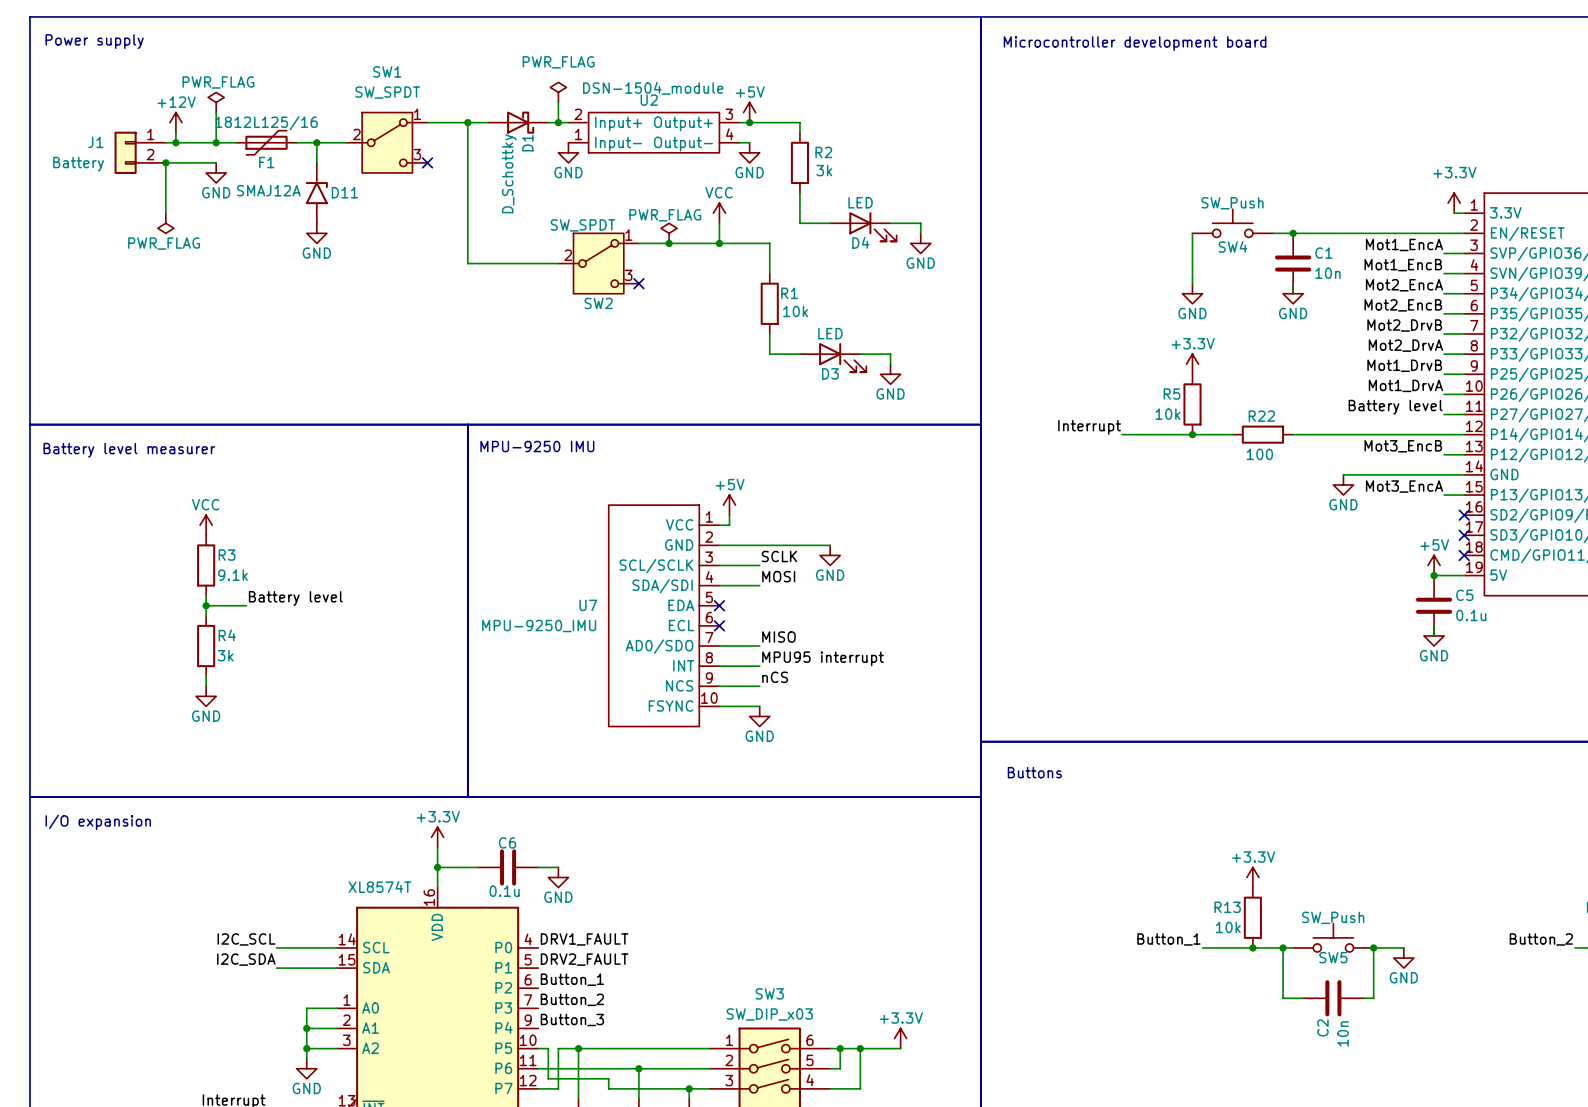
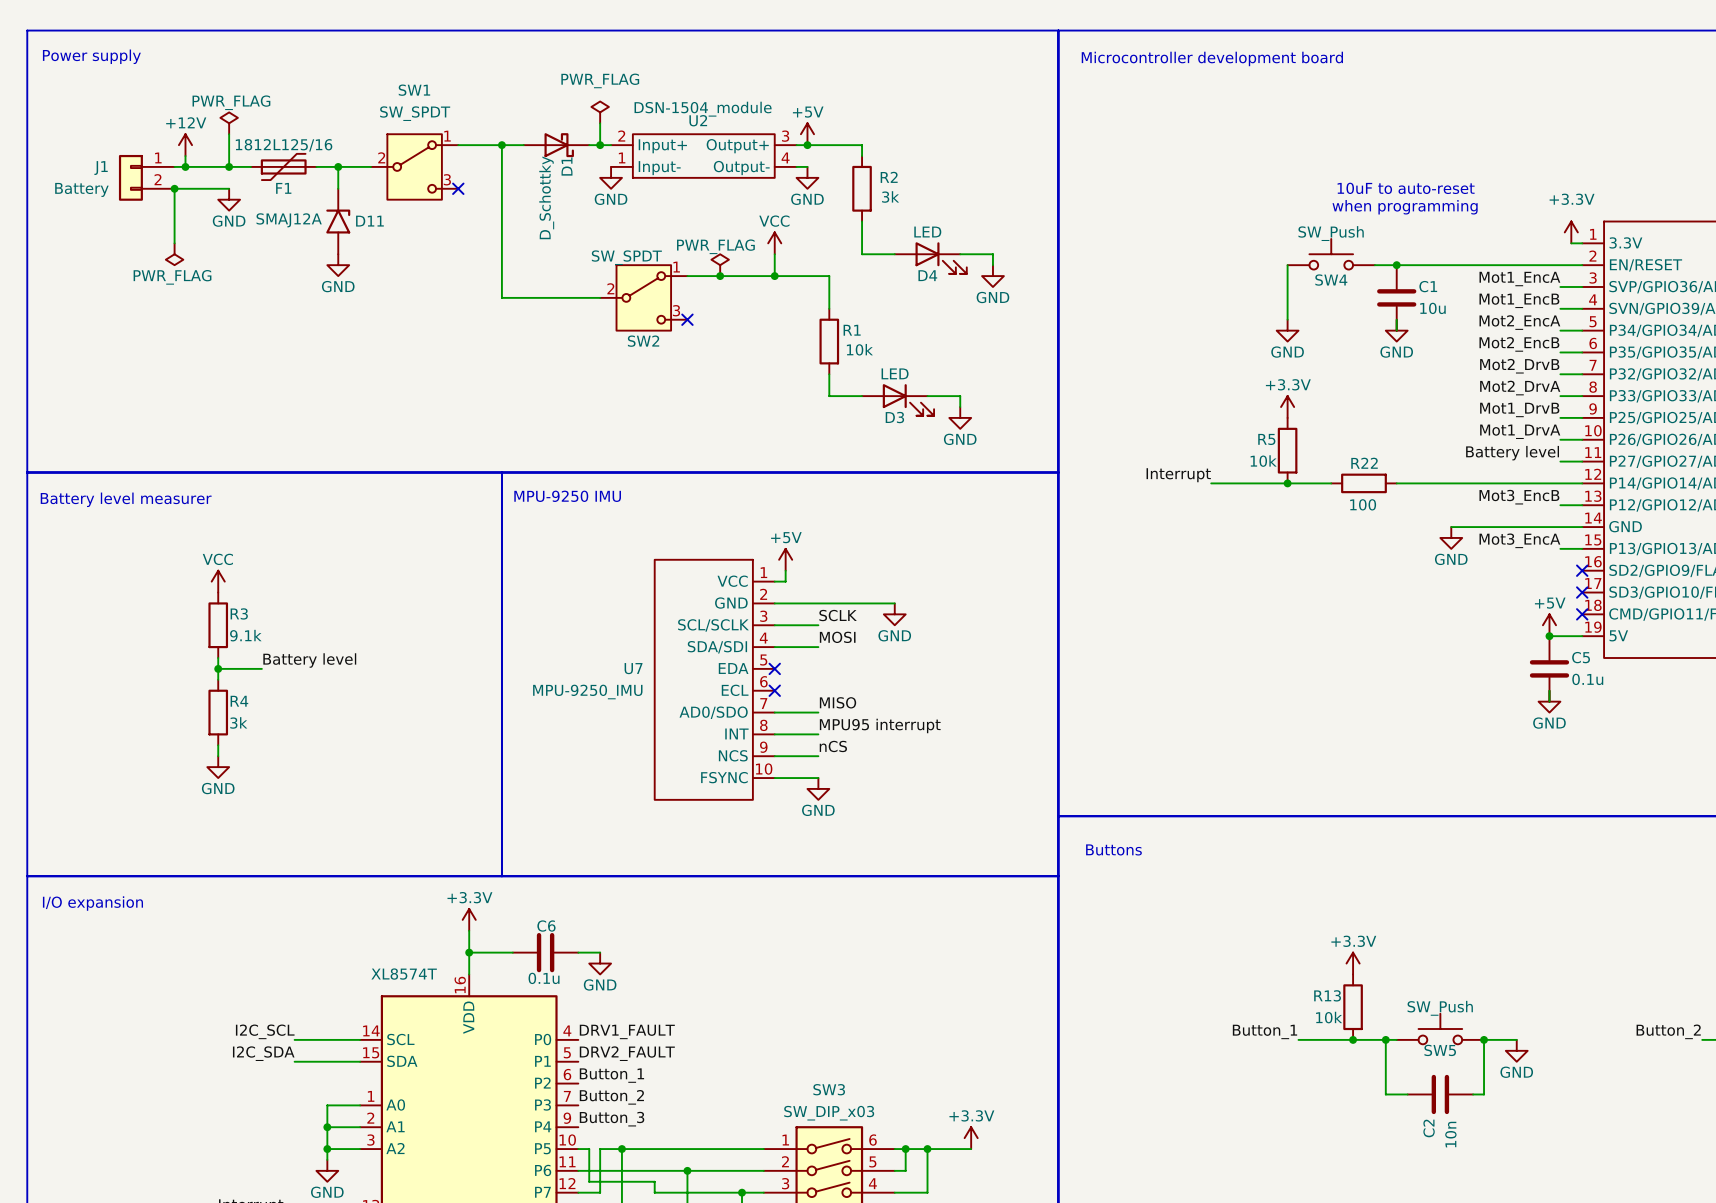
text: none -> 10uF to auto-reset (1406, 188)
text: none -> when programming (1405, 207)
C1 value: 10n (1327, 273) -> 10u (1432, 308)

